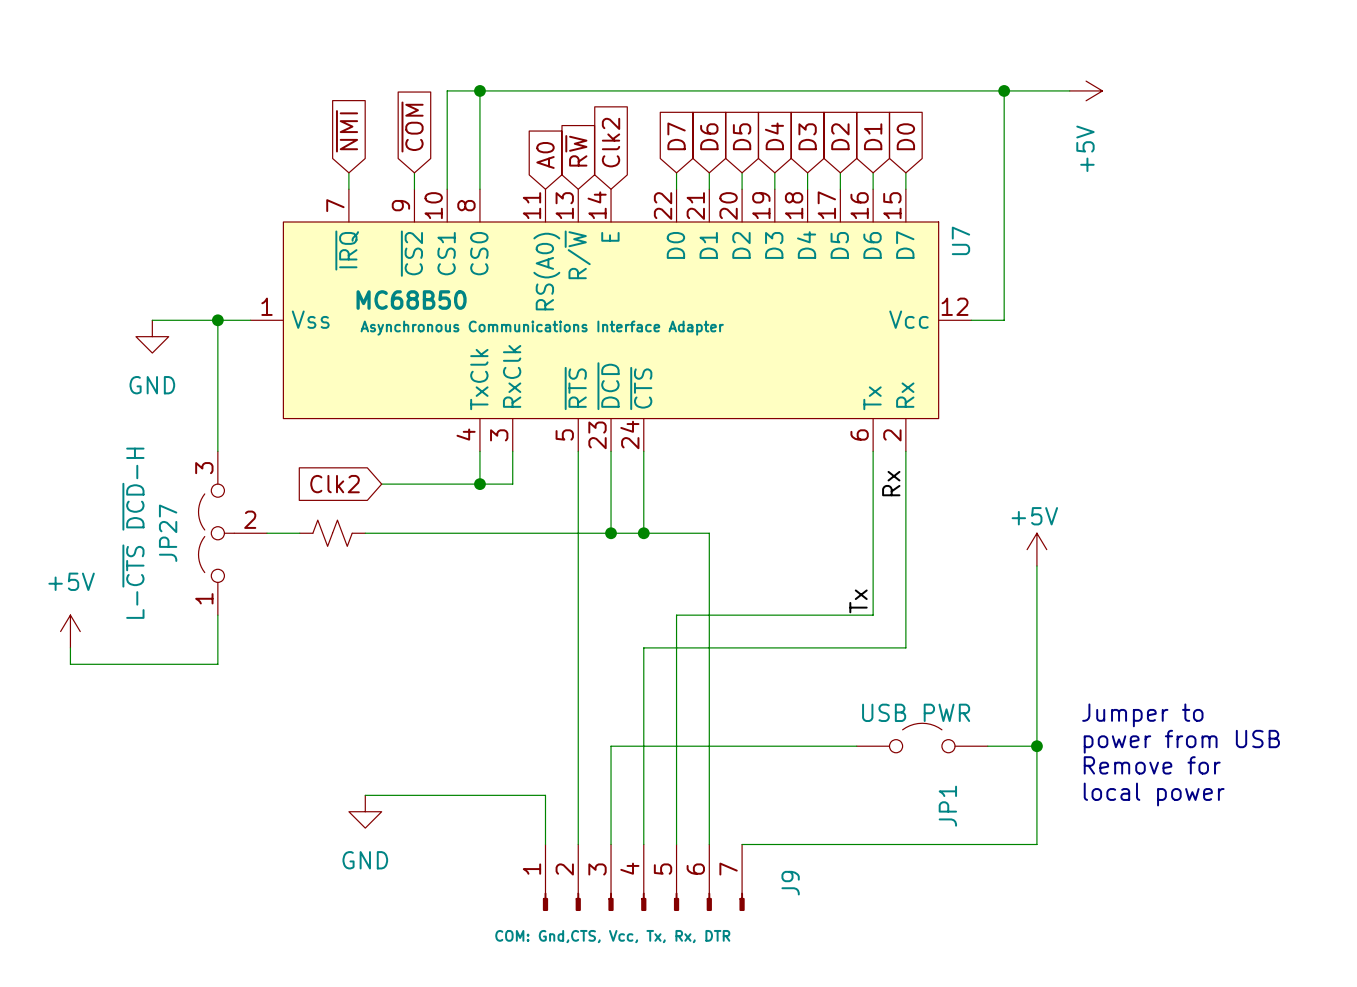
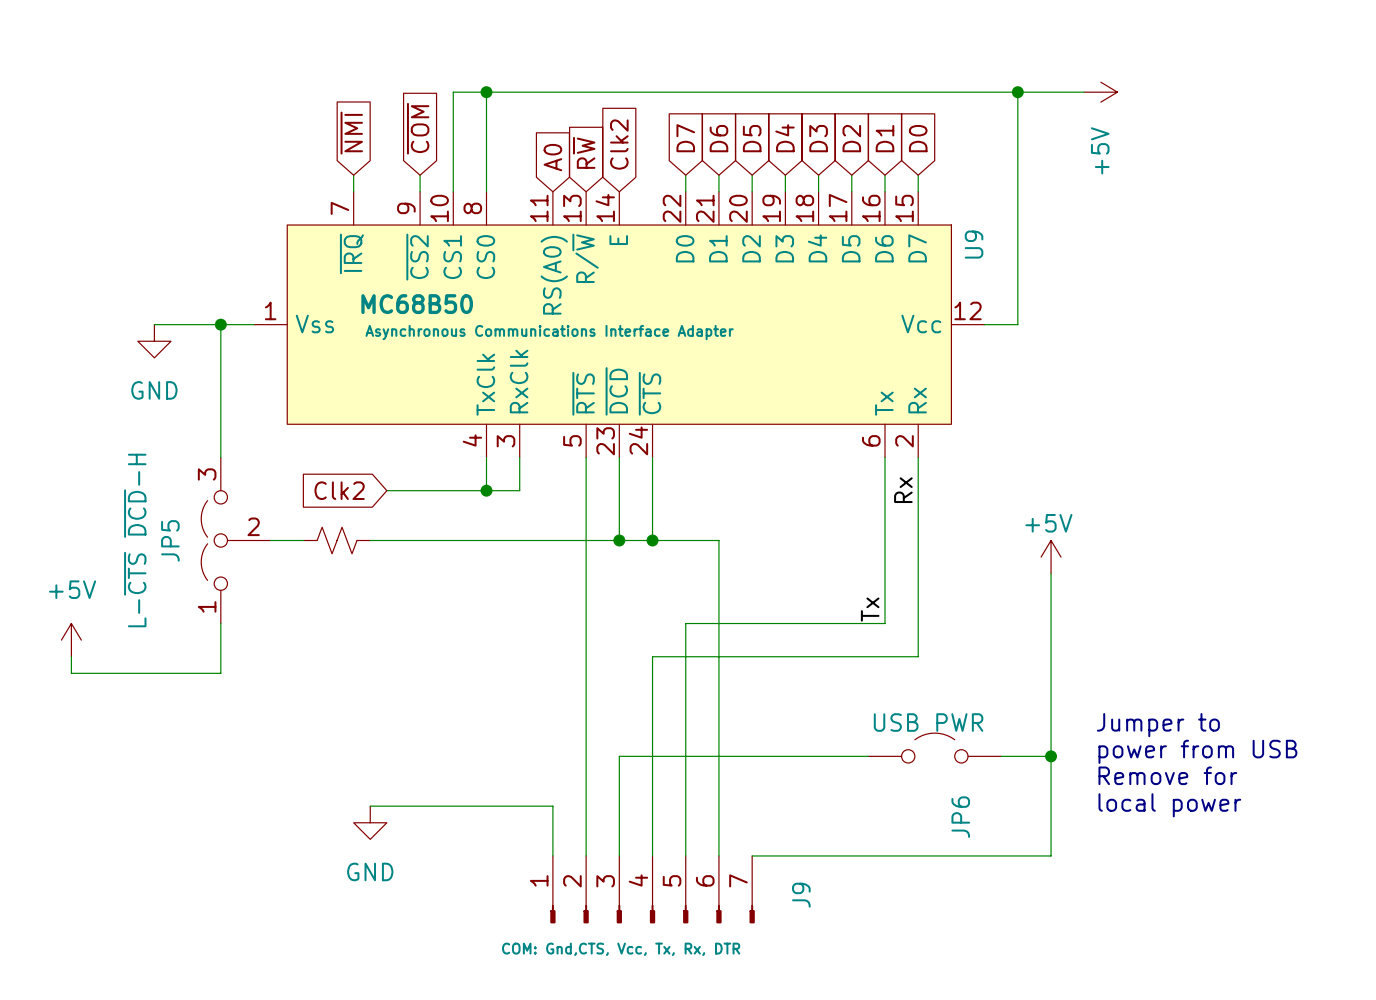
U7 name: U7 (960, 240) -> U9 (974, 244)
JP27 name: JP27 (168, 533) -> JP5 (170, 540)
JP1 name: JP1 (947, 806) -> JP6 (960, 817)

